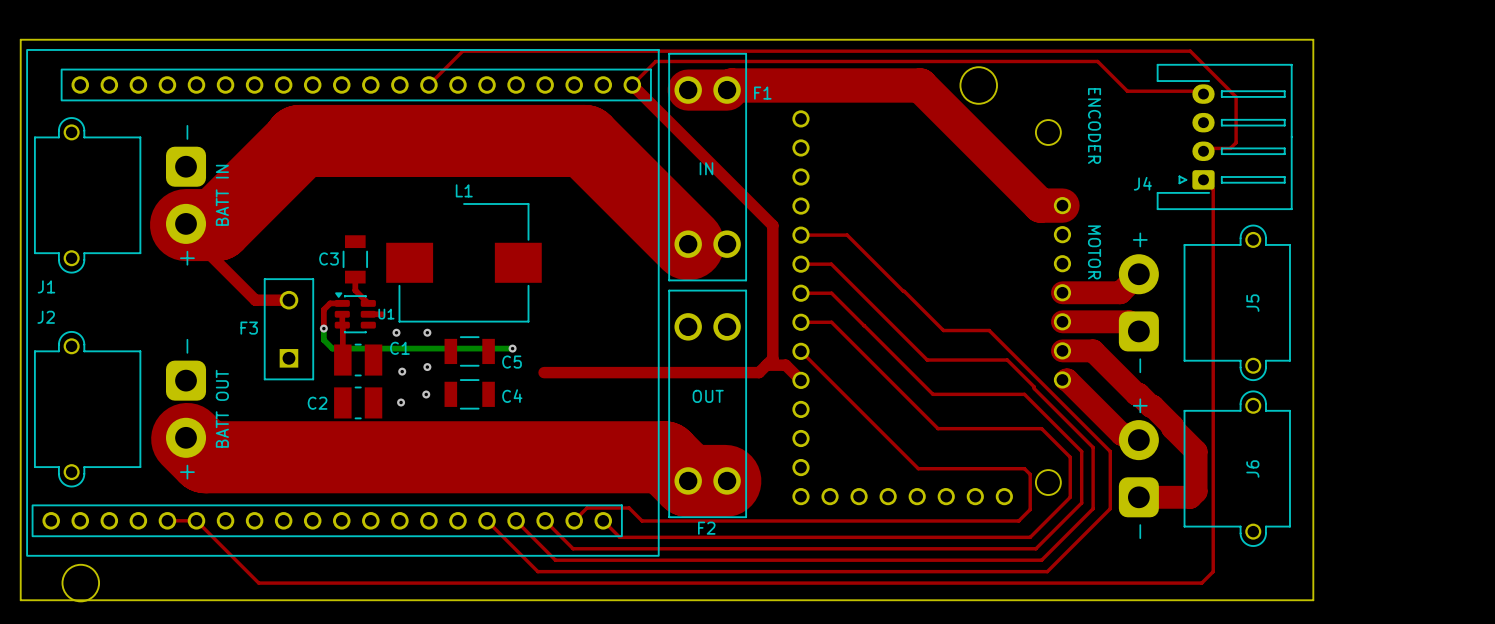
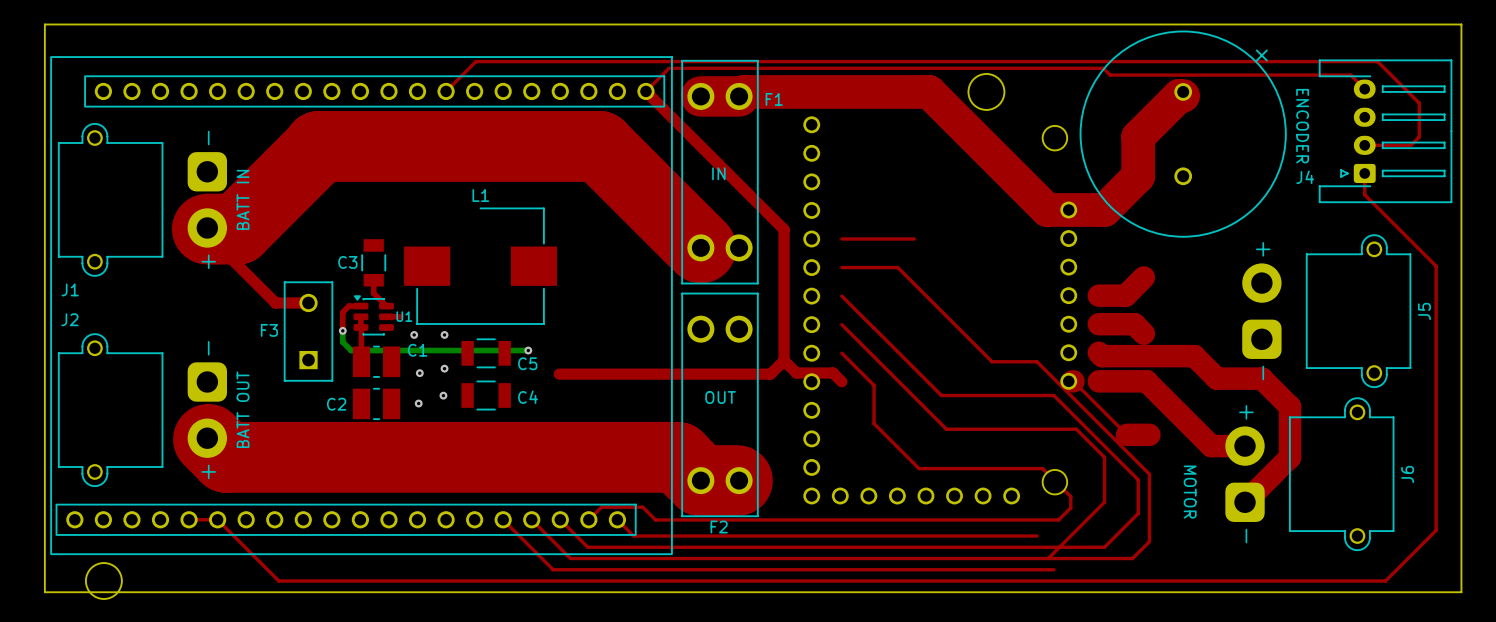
board edge: (20, 39) (1313, 39) (1313, 600) (20, 600) (20, 594) -> (44, 46) (44, 24) (1461, 24) (1461, 592) (44, 592)
top track: (459, 54) (462, 51) (1190, 51) (1236, 96) (1236, 142) (1230, 148) (1206, 148) (1203, 151) -> (475, 61) (1377, 61) (1419, 103) (1419, 136) (1410, 145) (1364, 145)
top track: (1104, 68) (1127, 91) (1200, 91) (1203, 94) -> (1110, 75) (1350, 75) (1364, 89)
top track: none -> (1183, 95) (1179, 95) (1138, 136) (1138, 176) (1104, 209) (1068, 209)
text position: ENCODER (1094, 126) -> ENCODER (1302, 126)
part: none -> (1183, 134)
J4 position: (1224, 136) -> (1385, 131)
top track: (1200, 177) (1213, 189) (1213, 571) (1201, 583) -> (1364, 173) (1364, 194) (1436, 266) (1436, 530) (1385, 581) (1205, 581)
top track: (800, 235) (831, 235) -> none
top track: (847, 235) (943, 330) (989, 330) (1110, 451) (1110, 508) (1047, 571) -> (857, 239) (914, 239)
text position: MOTOR (1094, 252) -> MOTOR (1190, 492)
top track: (800, 264) (831, 264) (927, 360) (984, 360) -> (841, 267) (897, 267) (992, 361)
top track: (1062, 292) (1093, 292) -> none
top track: (800, 293) (831, 293) -> none
J5 position: (1204, 302) -> (1326, 311)
J5 name position: J5 (1252, 303) -> J5 (1424, 311)
top track: (1062, 321) (1093, 321) -> none
top track: (800, 322) (831, 322) -> none
top track: (1062, 350) (1093, 350) -> none
top track: (800, 351) (918, 468) -> (841, 353) (874, 385) (874, 423) (918, 468) (927, 468)
top track: (1096, 354) (1136, 394) (1152, 406) (1196, 451) (1196, 491) (1190, 497) (1138, 497) -> (1102, 356) (1194, 356) (1216, 378) (1261, 378) (1289, 406) (1289, 457) (1245, 502)
top track: none -> (784, 360) (796, 373) (833, 373) (841, 381)
top track: (1007, 360) (1093, 447) (1093, 508) -> (1014, 361) (1037, 361) (1149, 474) (1149, 541) (1132, 558) (1048, 558)
top track: (766, 365) (785, 365) (800, 380) -> none
top track width: thick (1067, 379) (1121, 434) -> thin (1073, 381) (1126, 434)
top track: none -> (1098, 381) (1146, 381) (1211, 446) (1245, 446)
top track: (1024, 394) (1081, 451) (1081, 503) (1035, 548) -> (1031, 395) (1053, 395) (1138, 479) (1138, 513) (1104, 547) (1042, 547)
top track: (1041, 428) (1070, 457) (1070, 497) (1030, 537) -> (1048, 429) (1076, 429) (1104, 457) (1104, 502) (1098, 507)
top track: (1024, 468) (1030, 474) (1030, 509) (1018, 520) -> (1031, 468) (1042, 468) (1070, 496) (1070, 507) (1058, 519) (1025, 519)
J6 position: (1204, 468) -> (1309, 474)
J6 name position: J6 (1252, 468) -> J6 (1407, 474)

